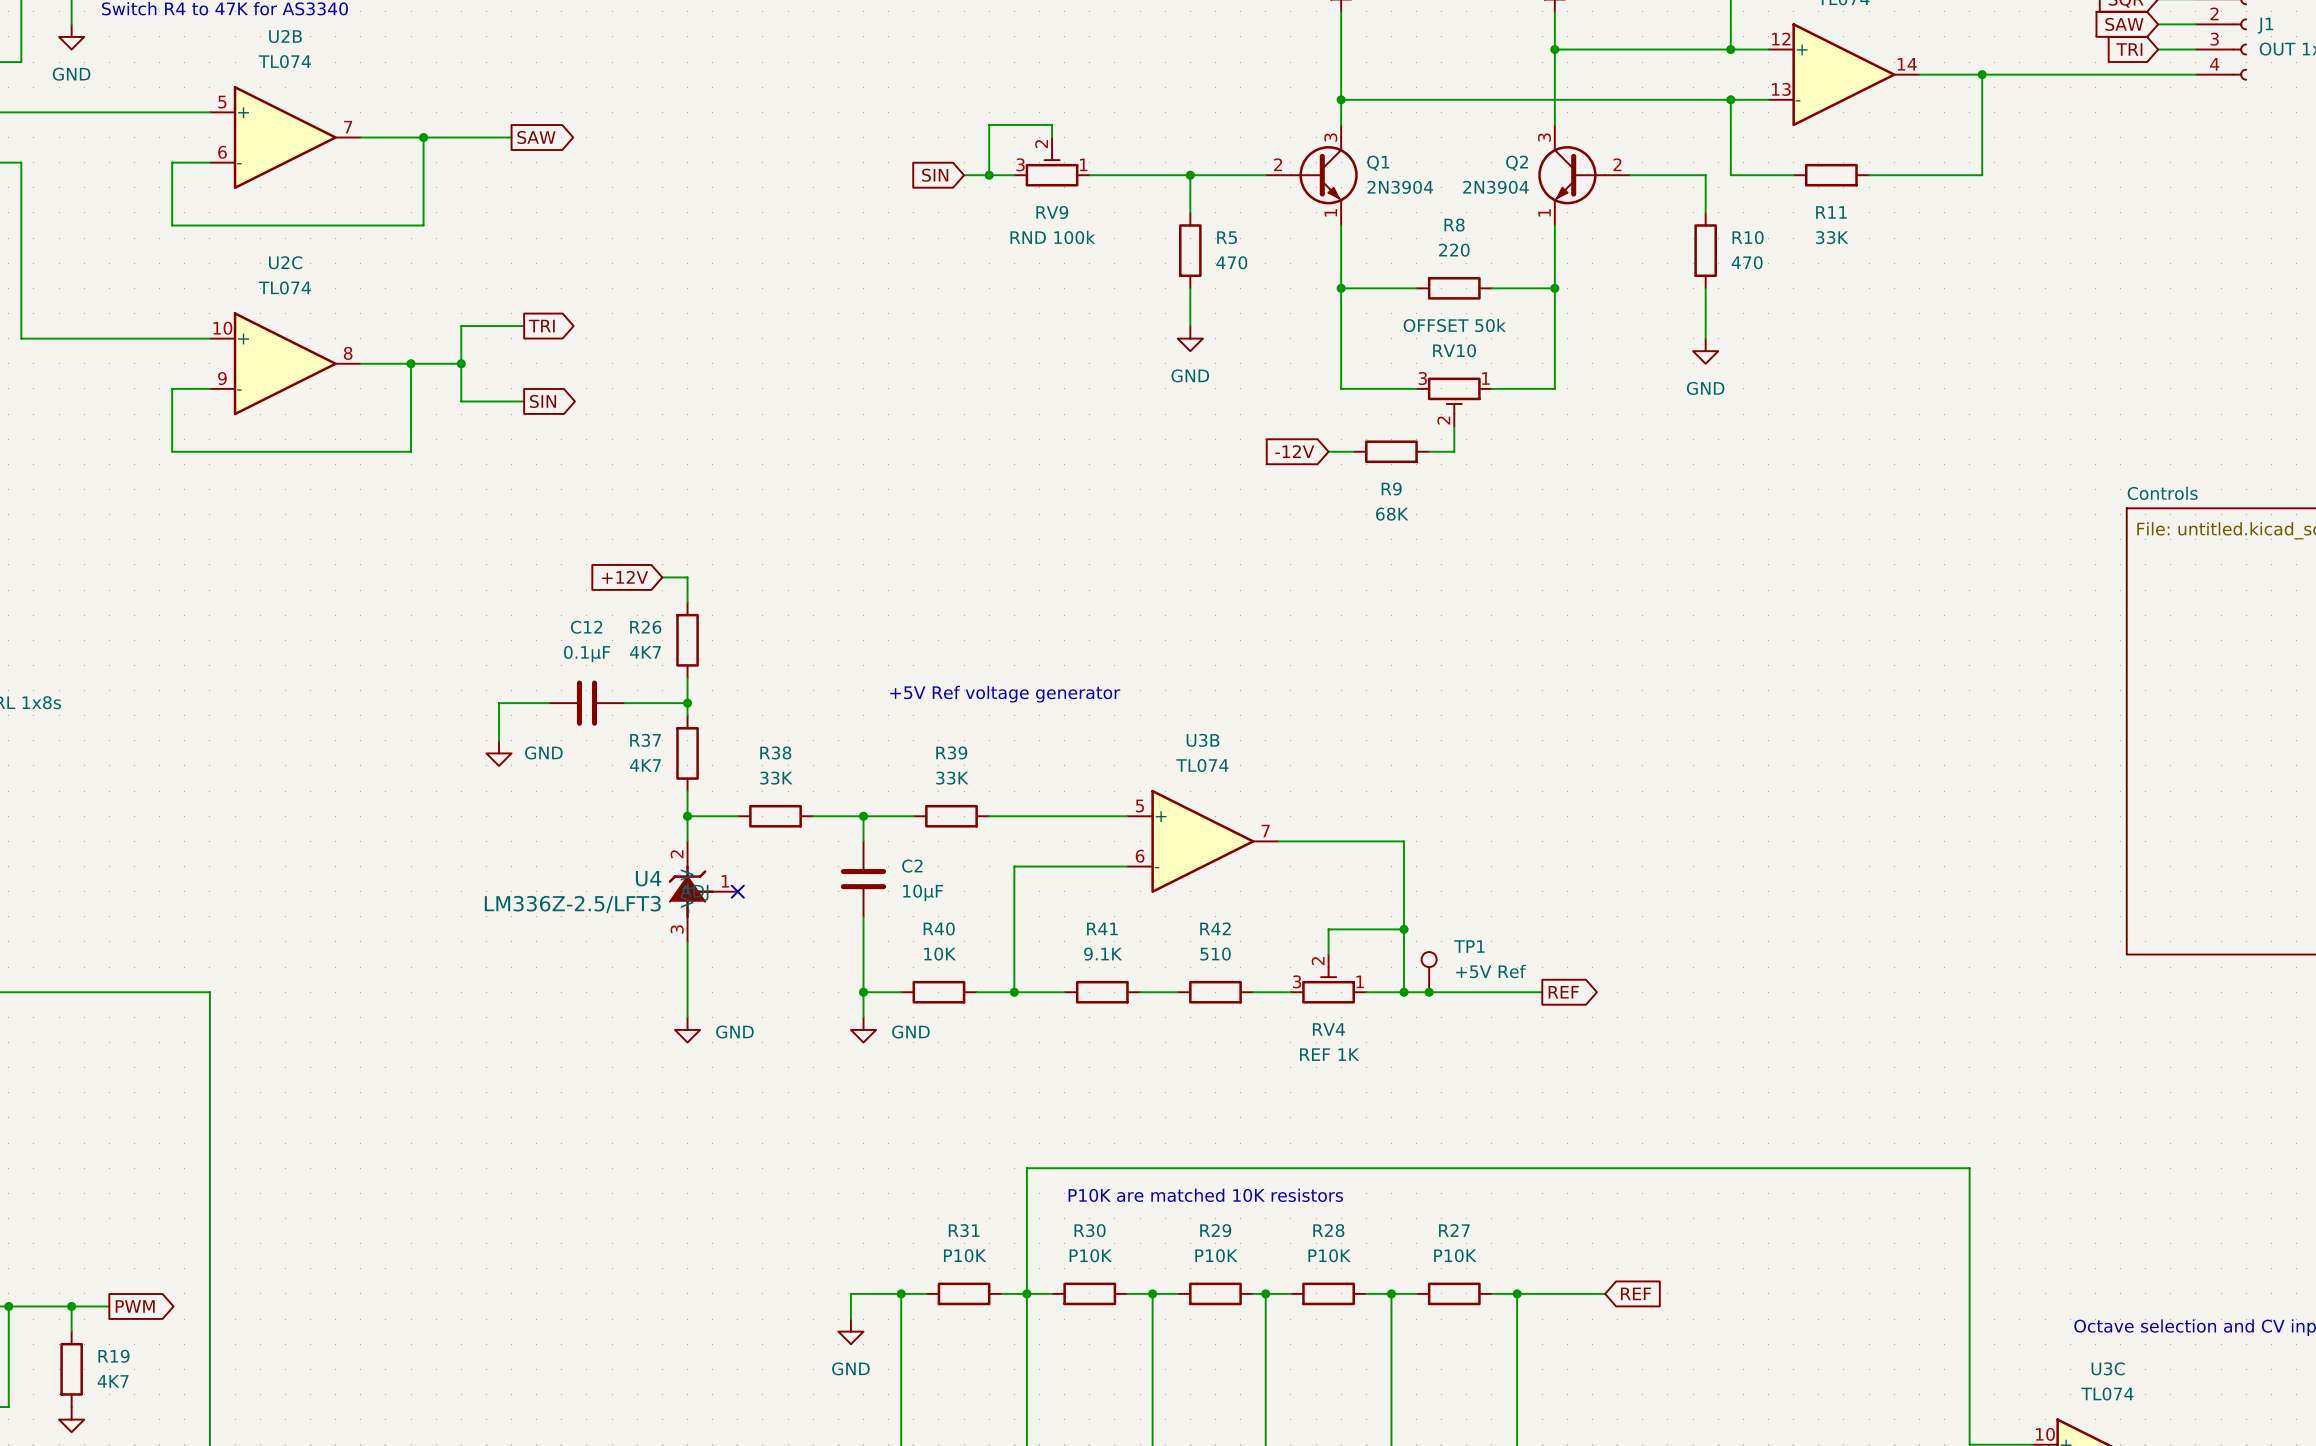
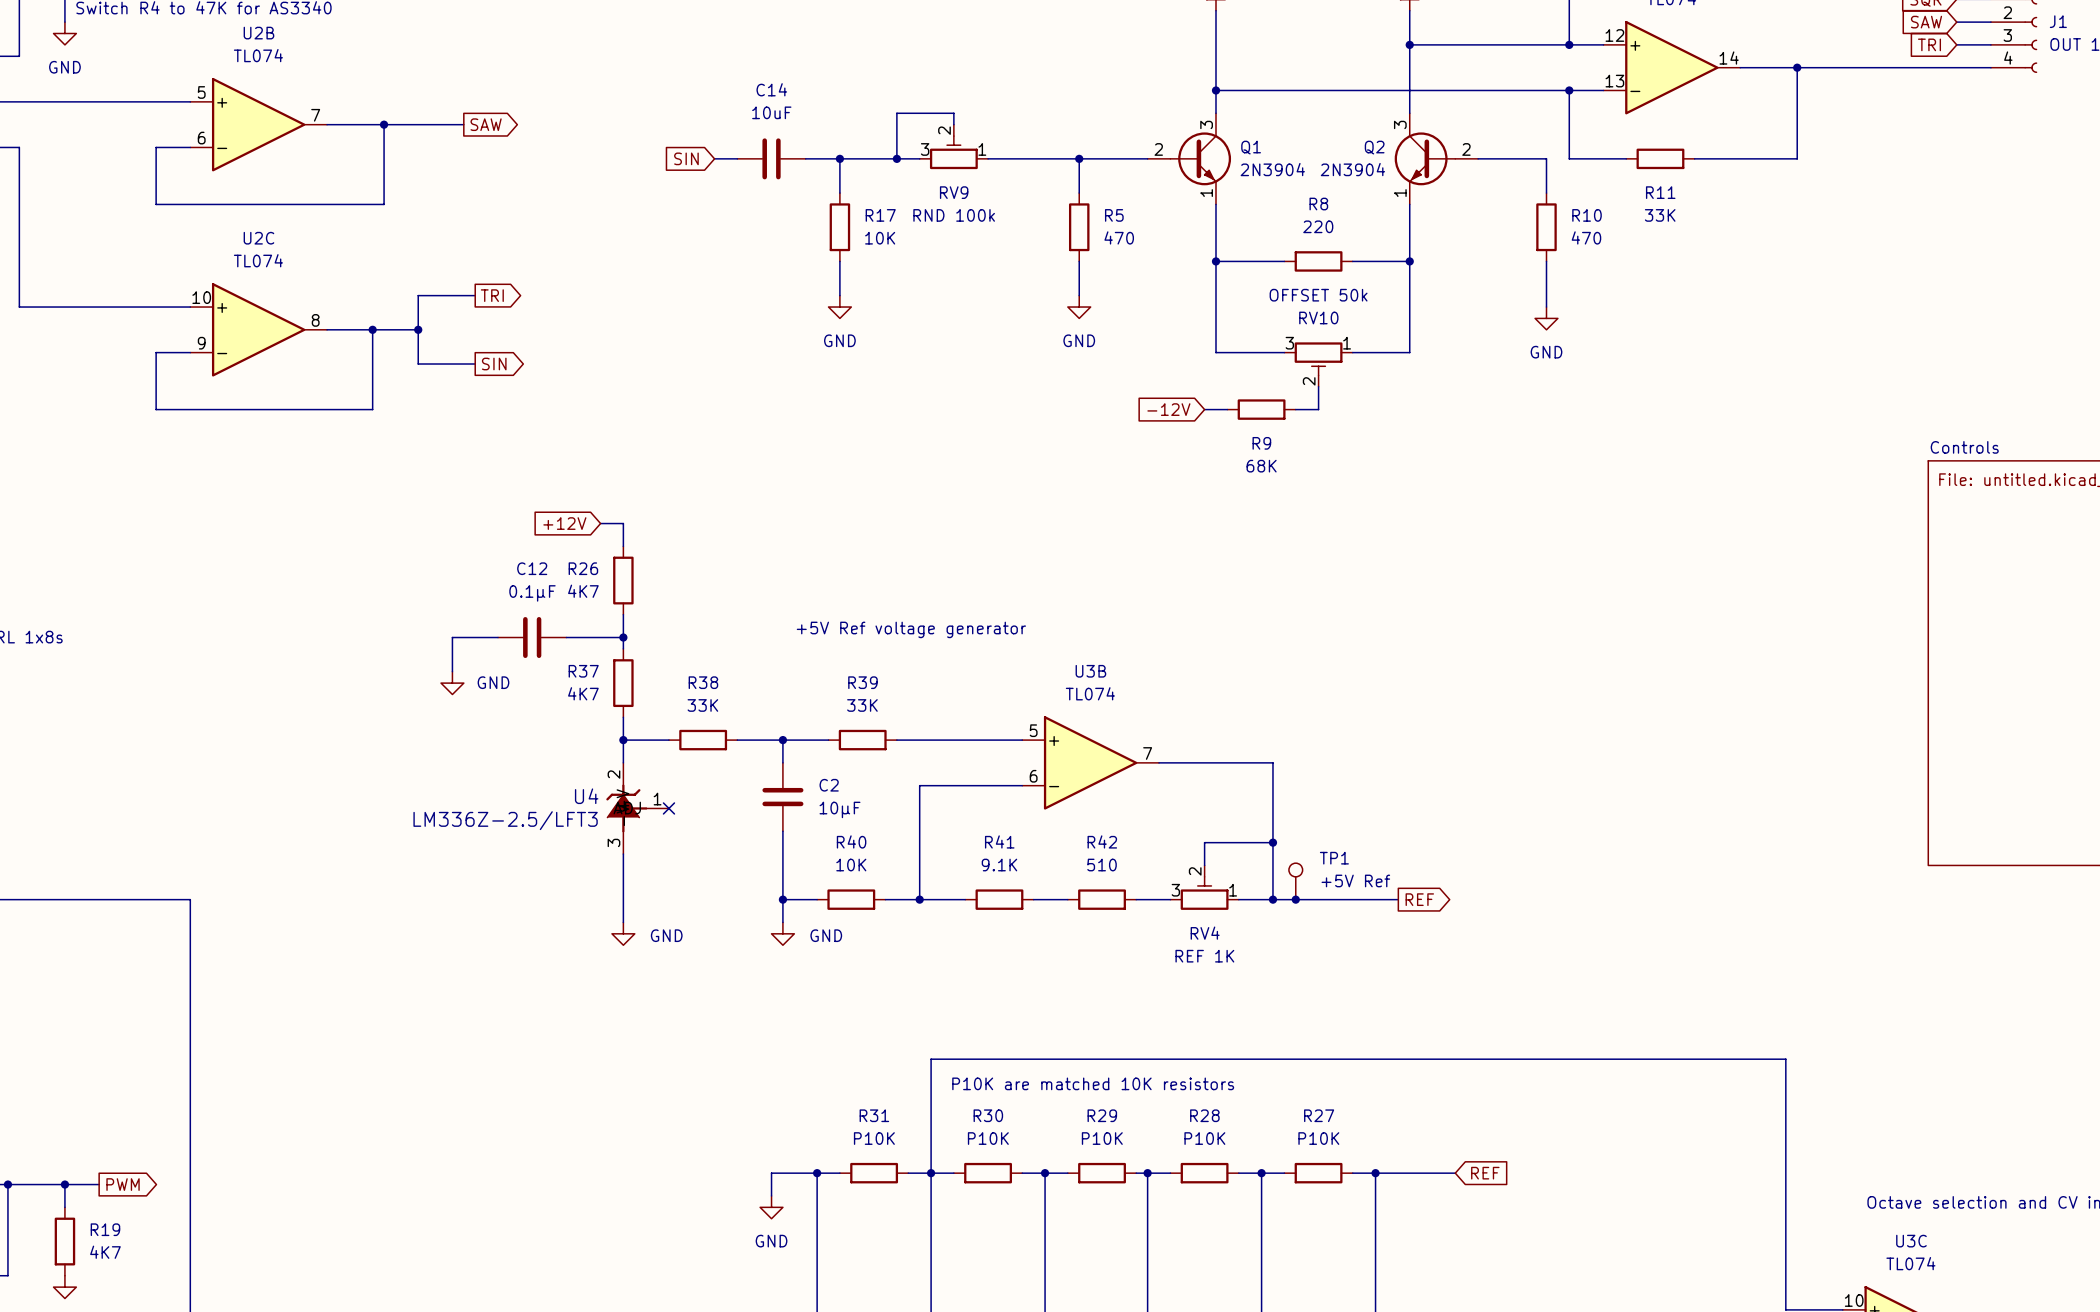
wire: none -> (714, 158) (737, 158)
C14: none -> 10uF (771, 158)
wire: none -> (805, 158) (874, 158)
wire: none -> (839, 158) (839, 193)
junction: none -> (839, 158)
global label position: SIN (935, 175) -> SIN (686, 158)
R17: none -> 10K (839, 227)
wire: none -> (839, 261) (839, 295)
power symbol: none -> GND (839, 307)

